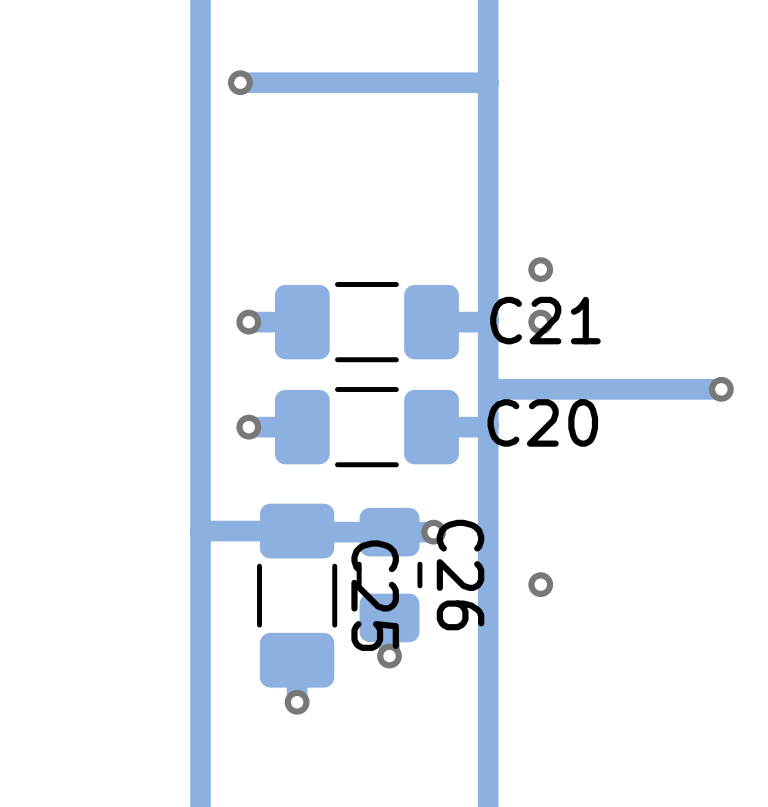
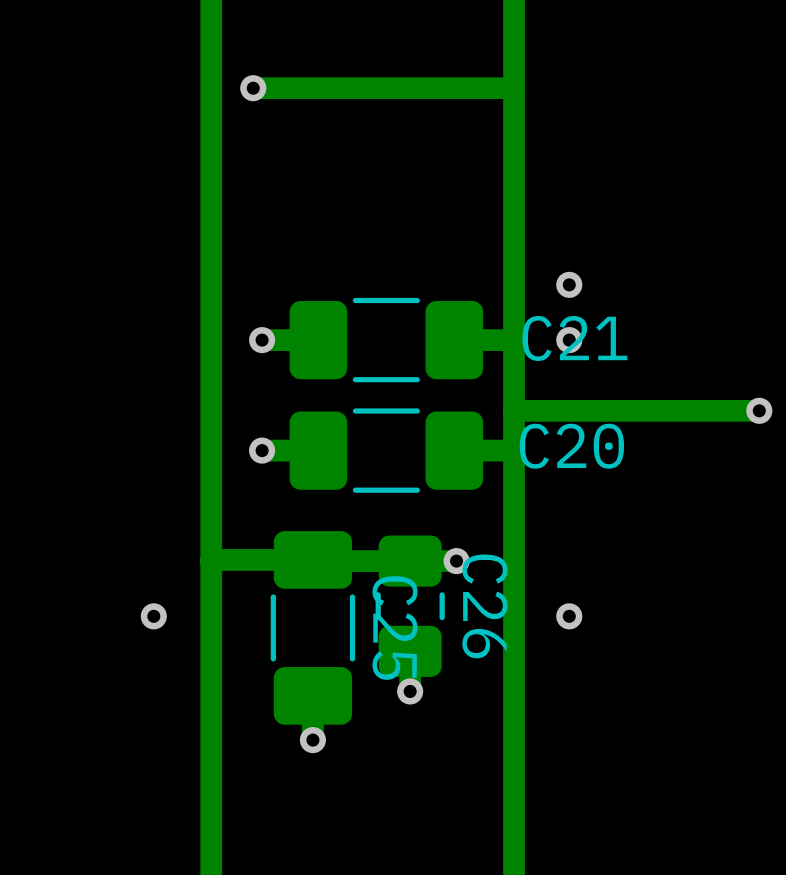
via: none -> (153, 616)

